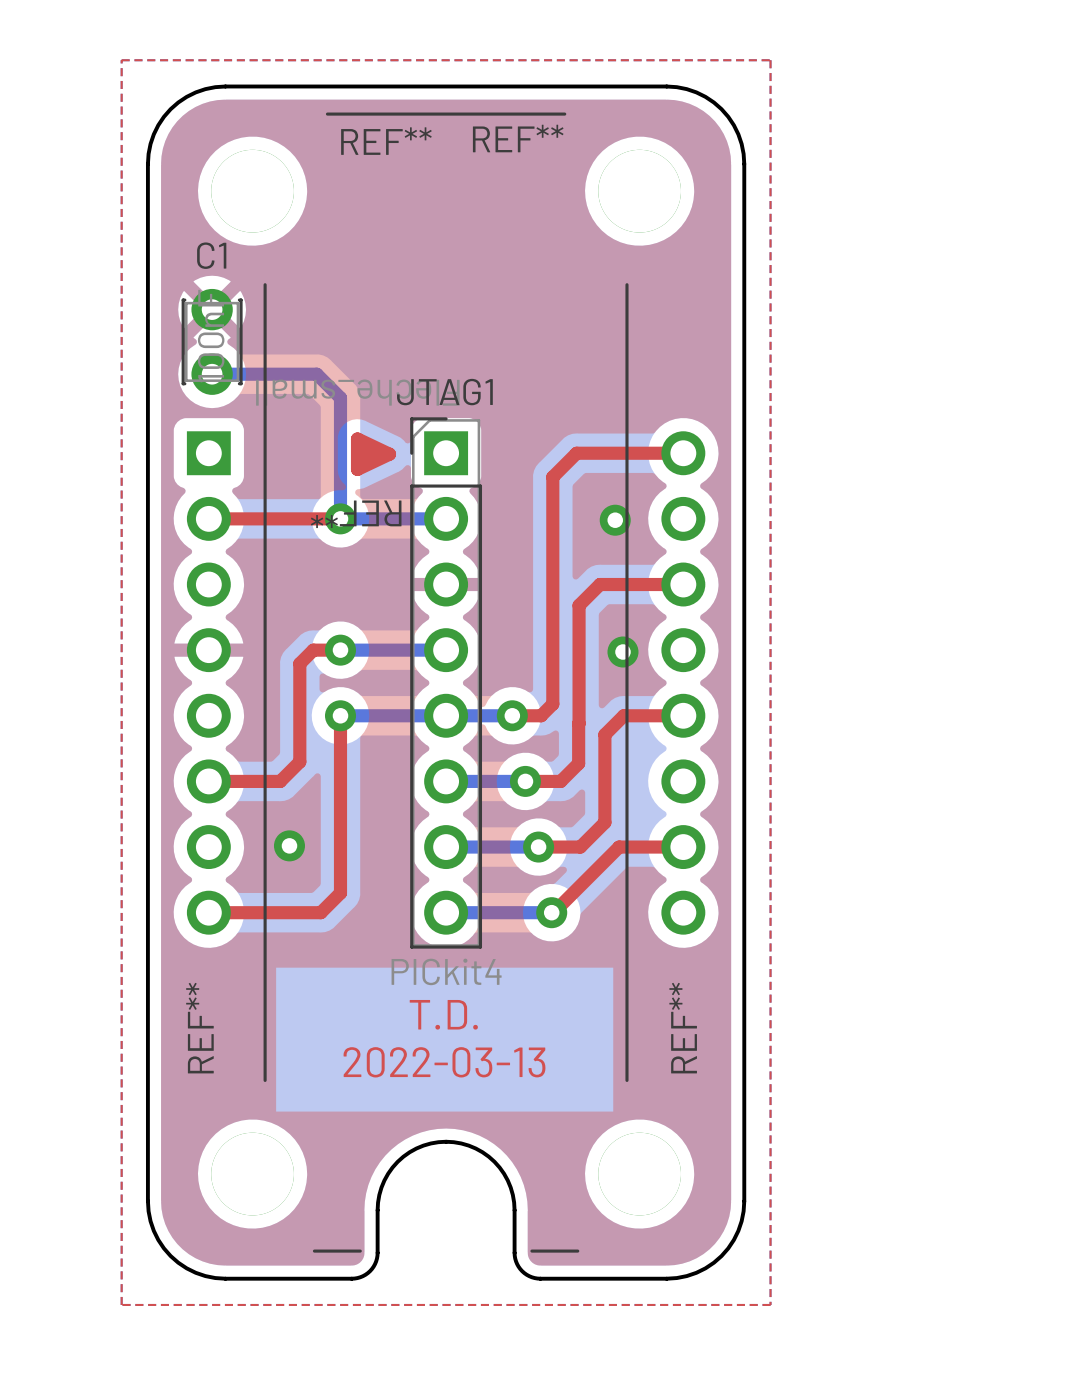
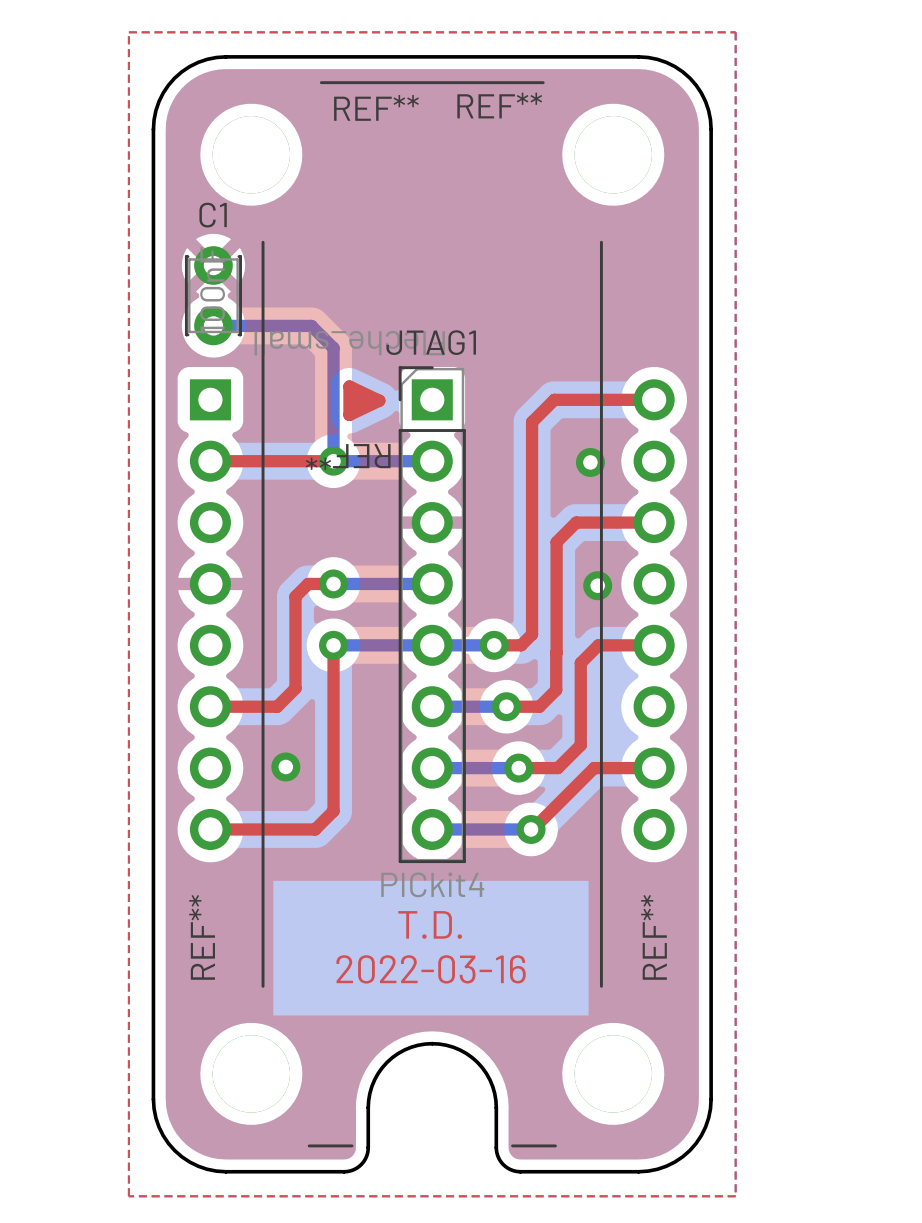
text: 2022-03-13 (444, 1062) -> 2022-03-16 (431, 969)

